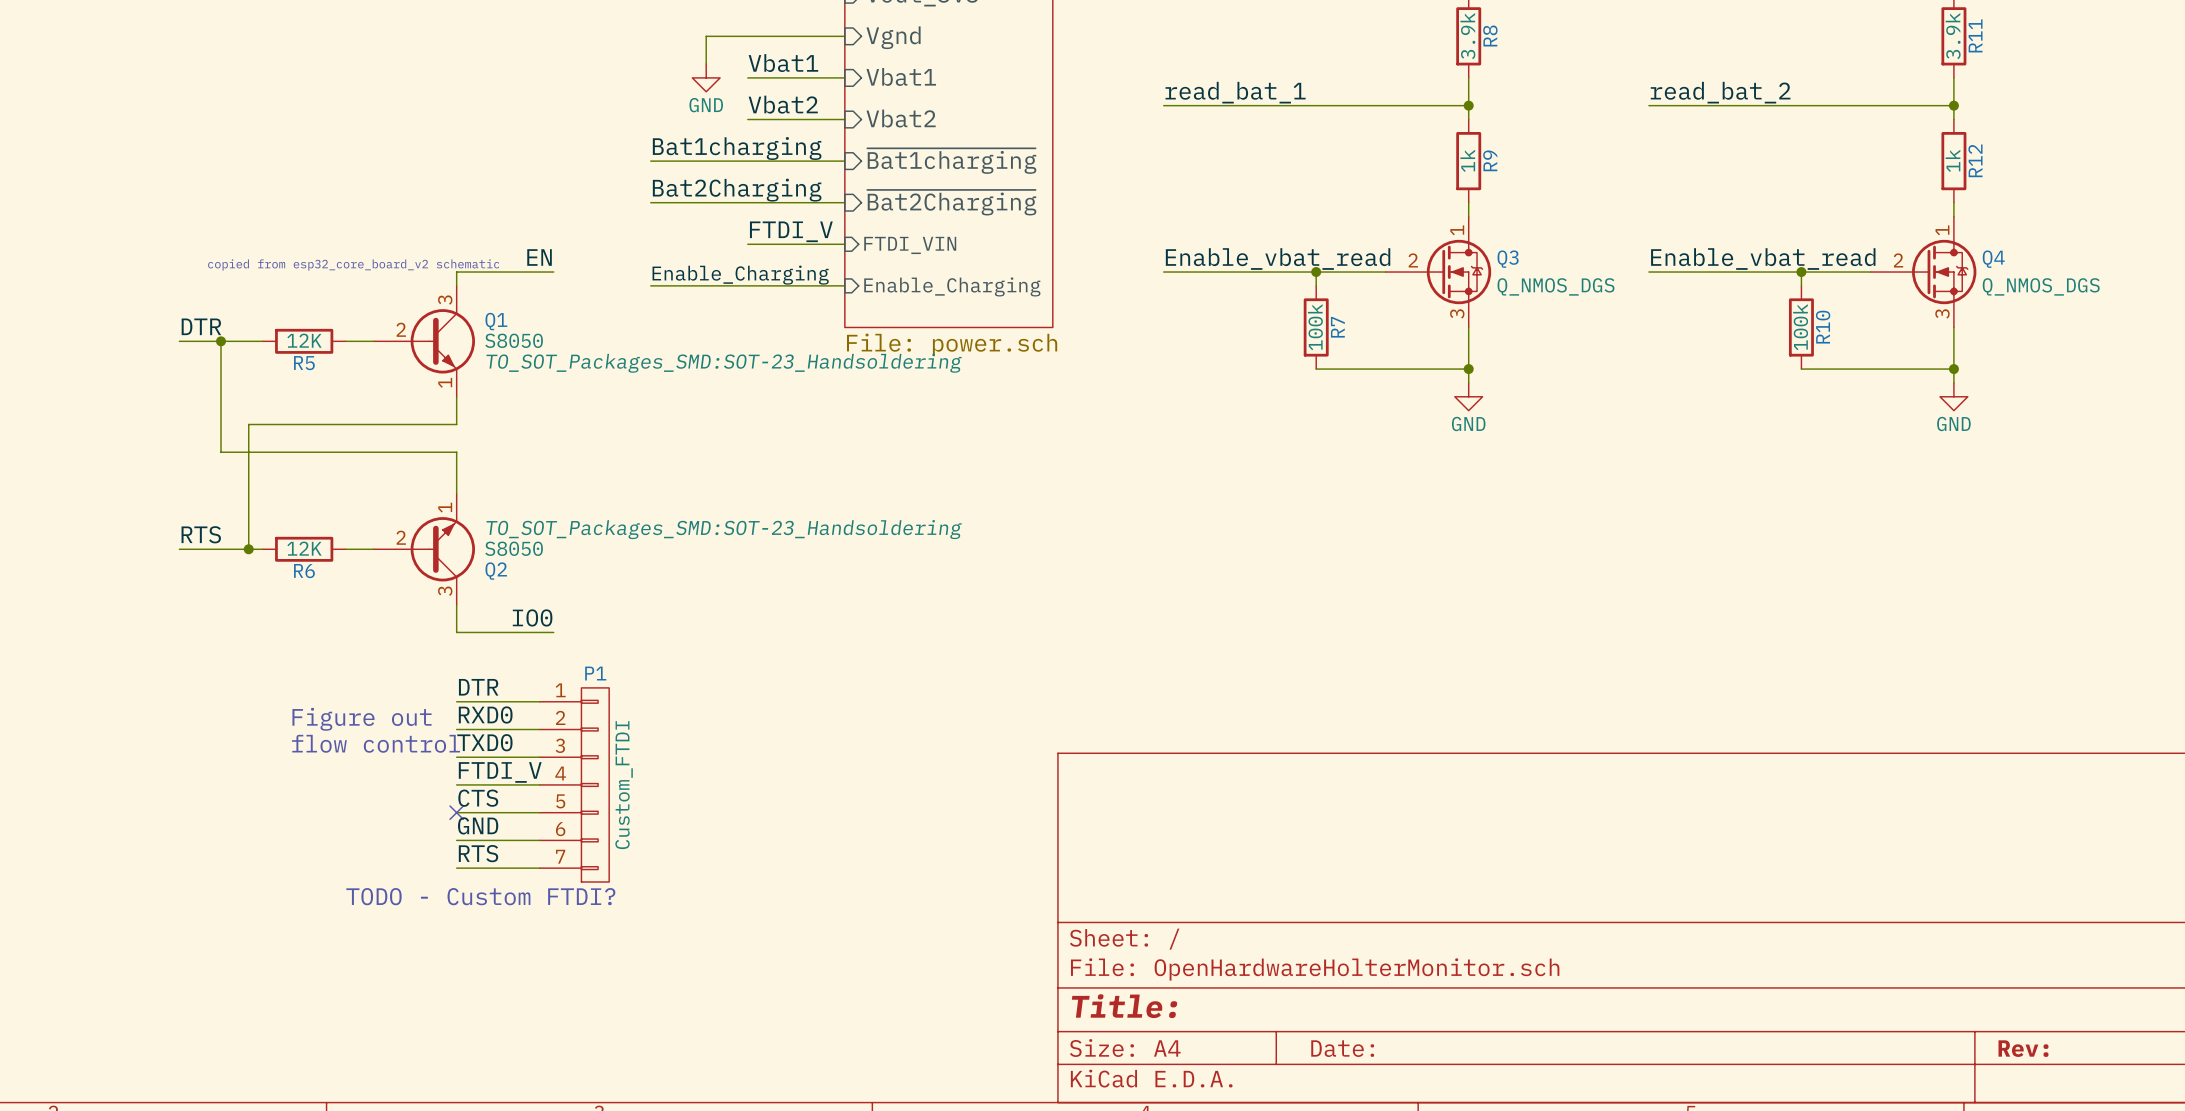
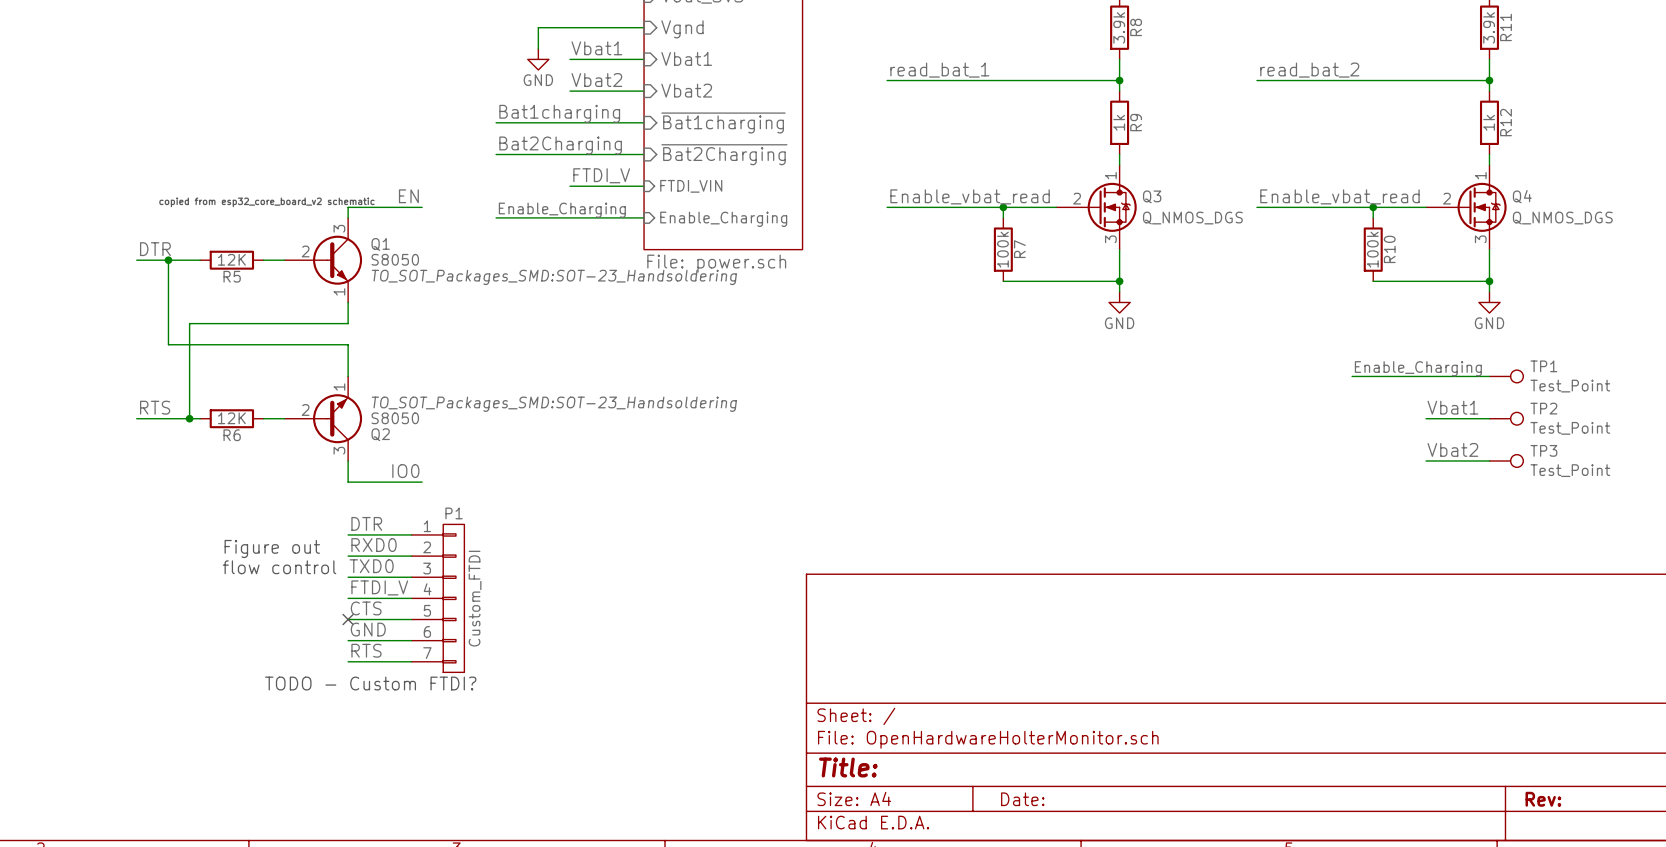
label: none -> Enable_Charging (1418, 368)
wire: none -> (1352, 376) (1489, 376)
TP1: none -> Test_Point (1506, 376)
label: none -> Vbat1 (1452, 407)
wire: none -> (1426, 418) (1489, 418)
TP2: none -> Test_Point (1506, 418)
label: none -> Vbat2 (1452, 449)
wire: none -> (1426, 460) (1489, 460)
TP3: none -> Test_Point (1506, 460)

